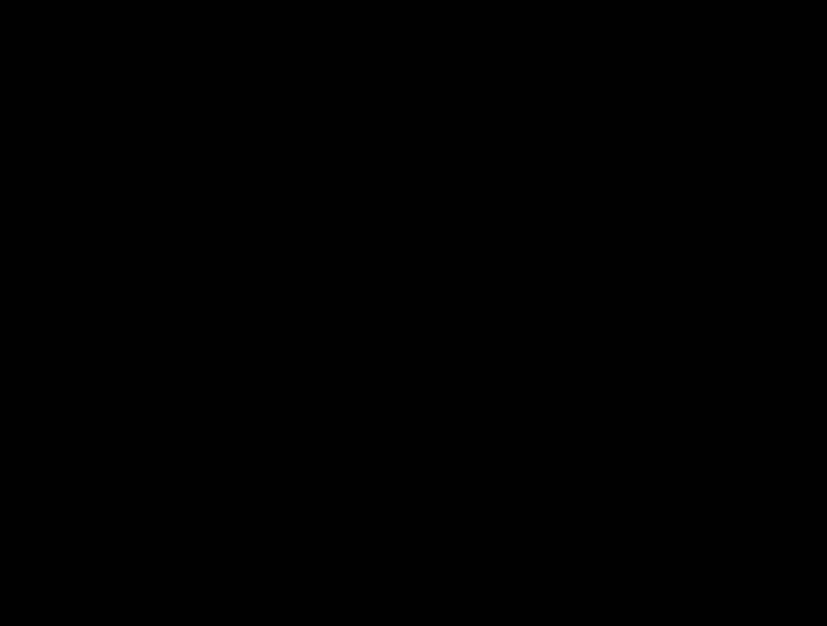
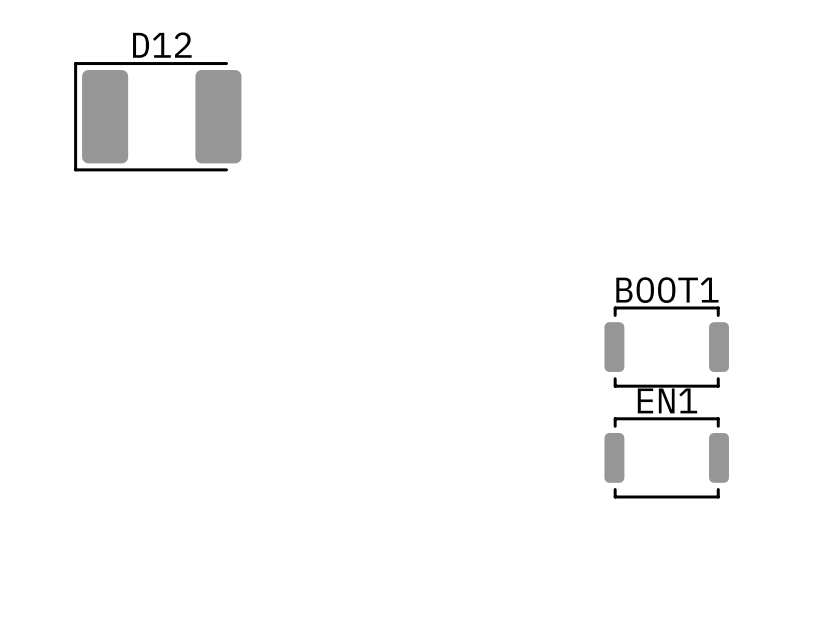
D12: none -> (157, 116)
BOOT1: none -> (666, 347)
EN1: none -> (666, 457)

